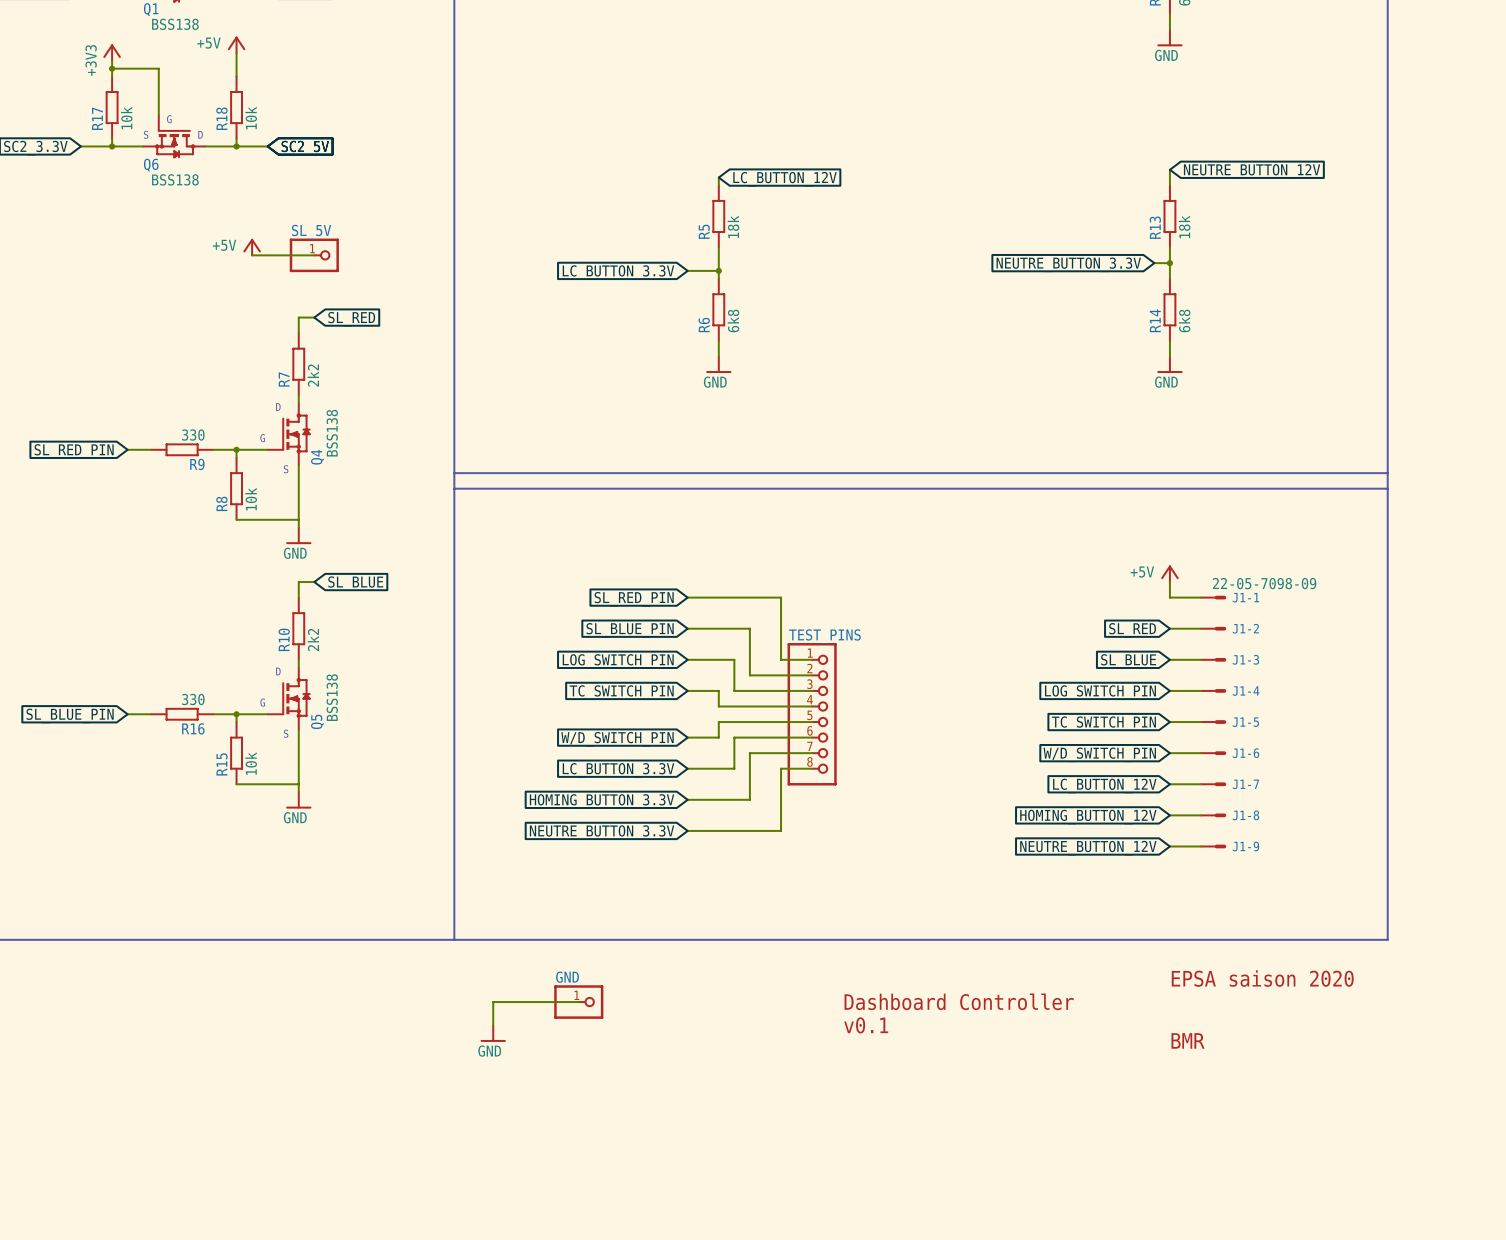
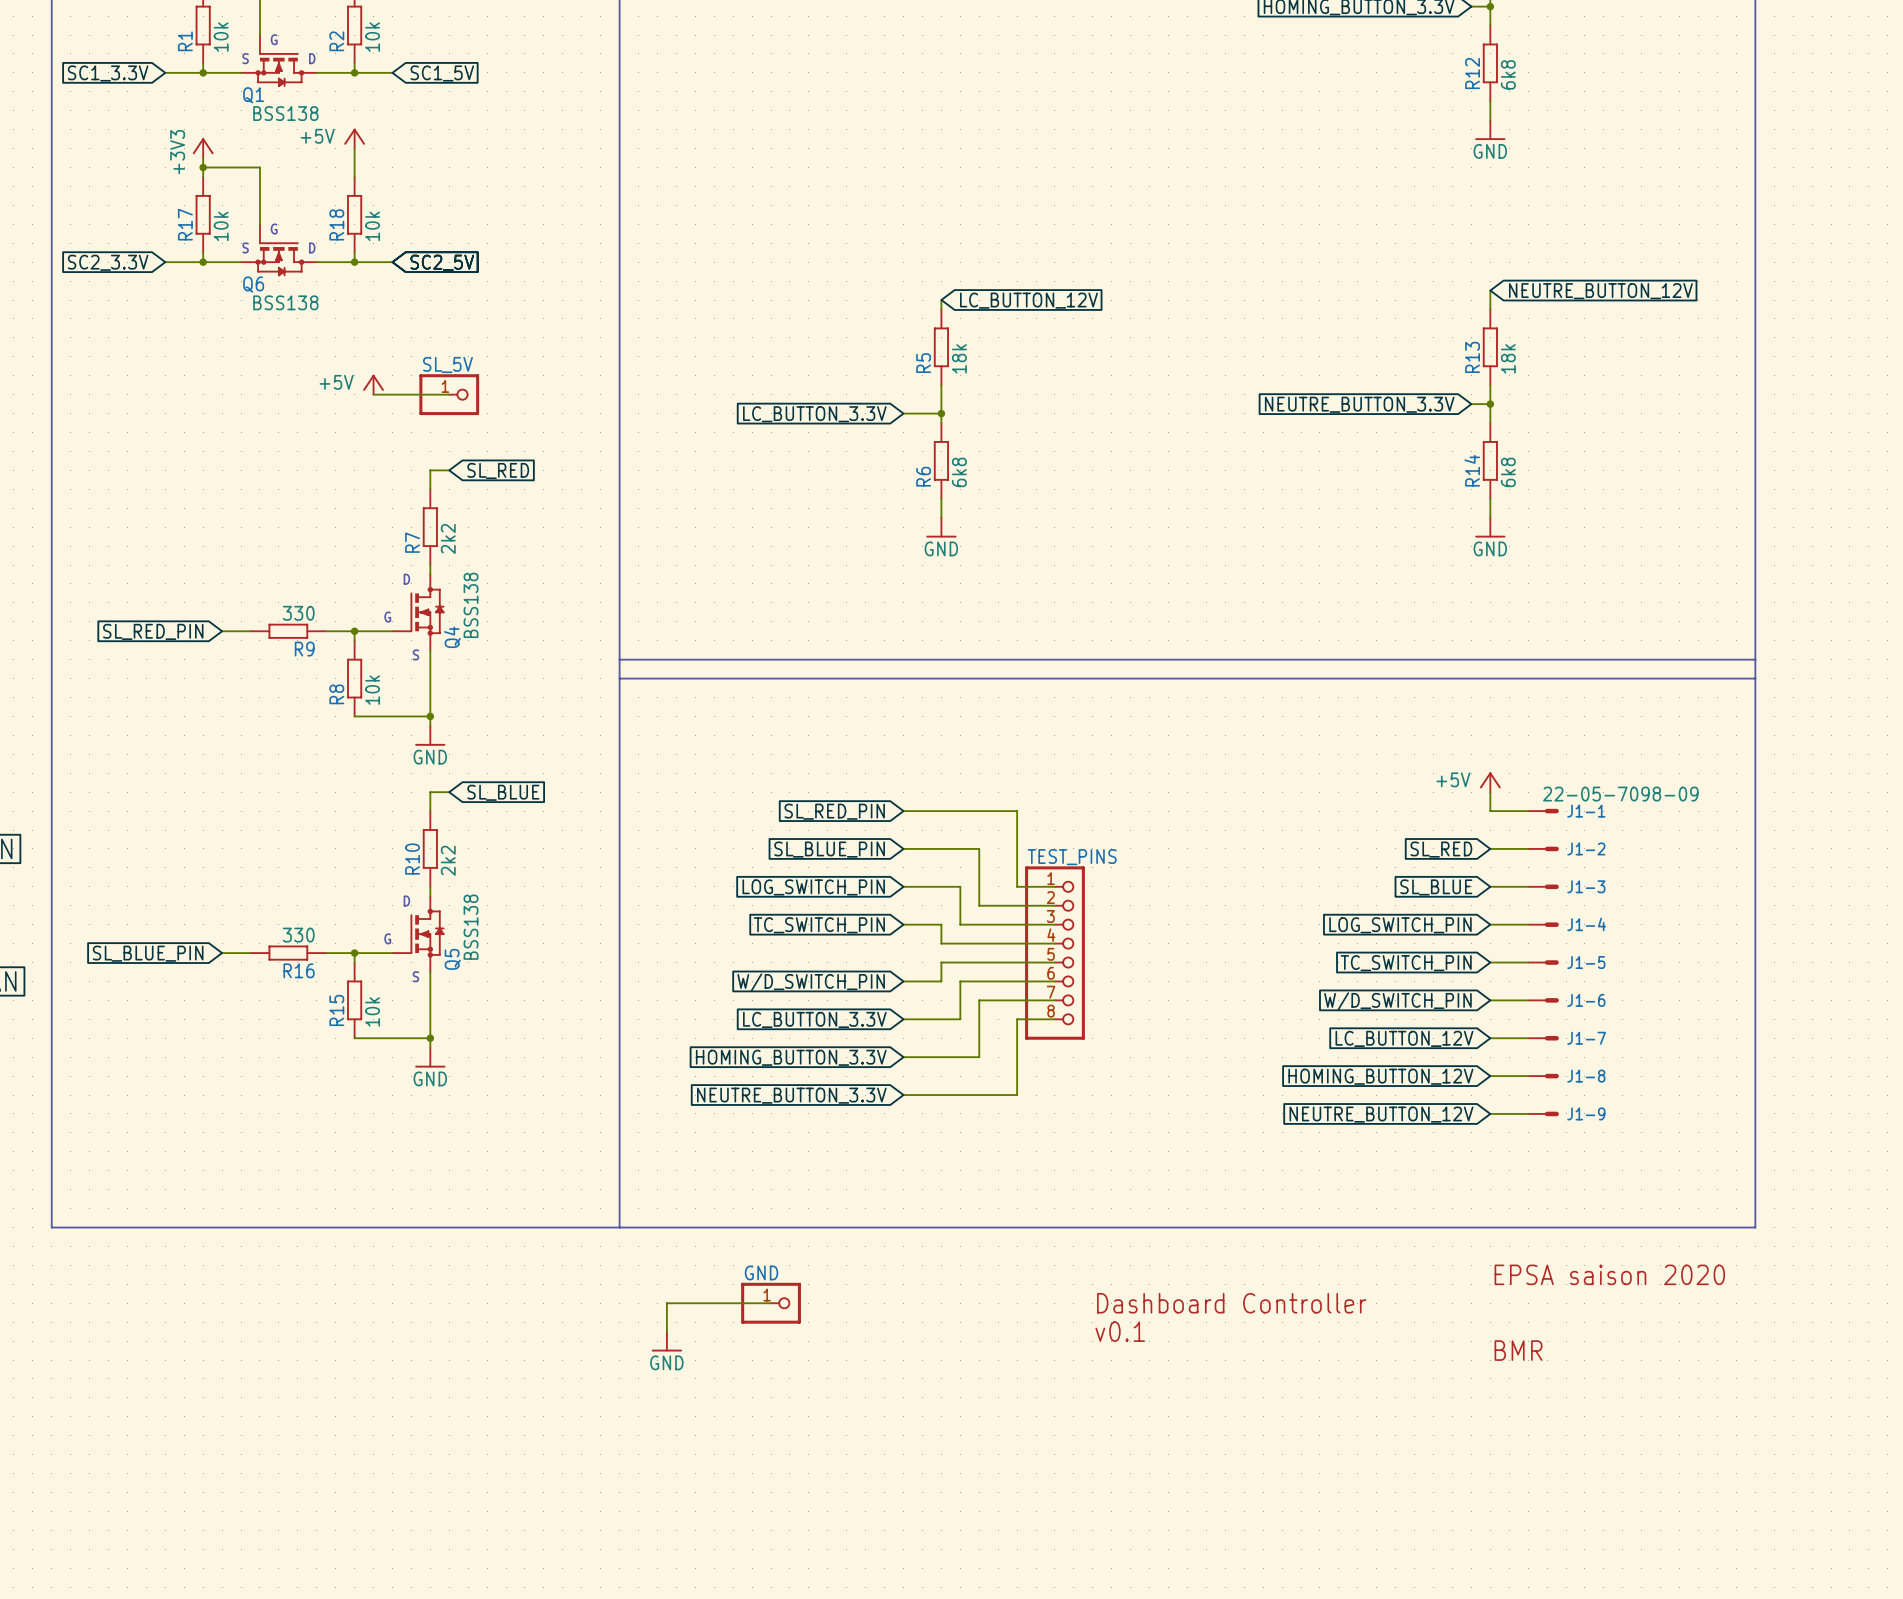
junction: none -> (430, 716)
junction: none -> (430, 1038)

